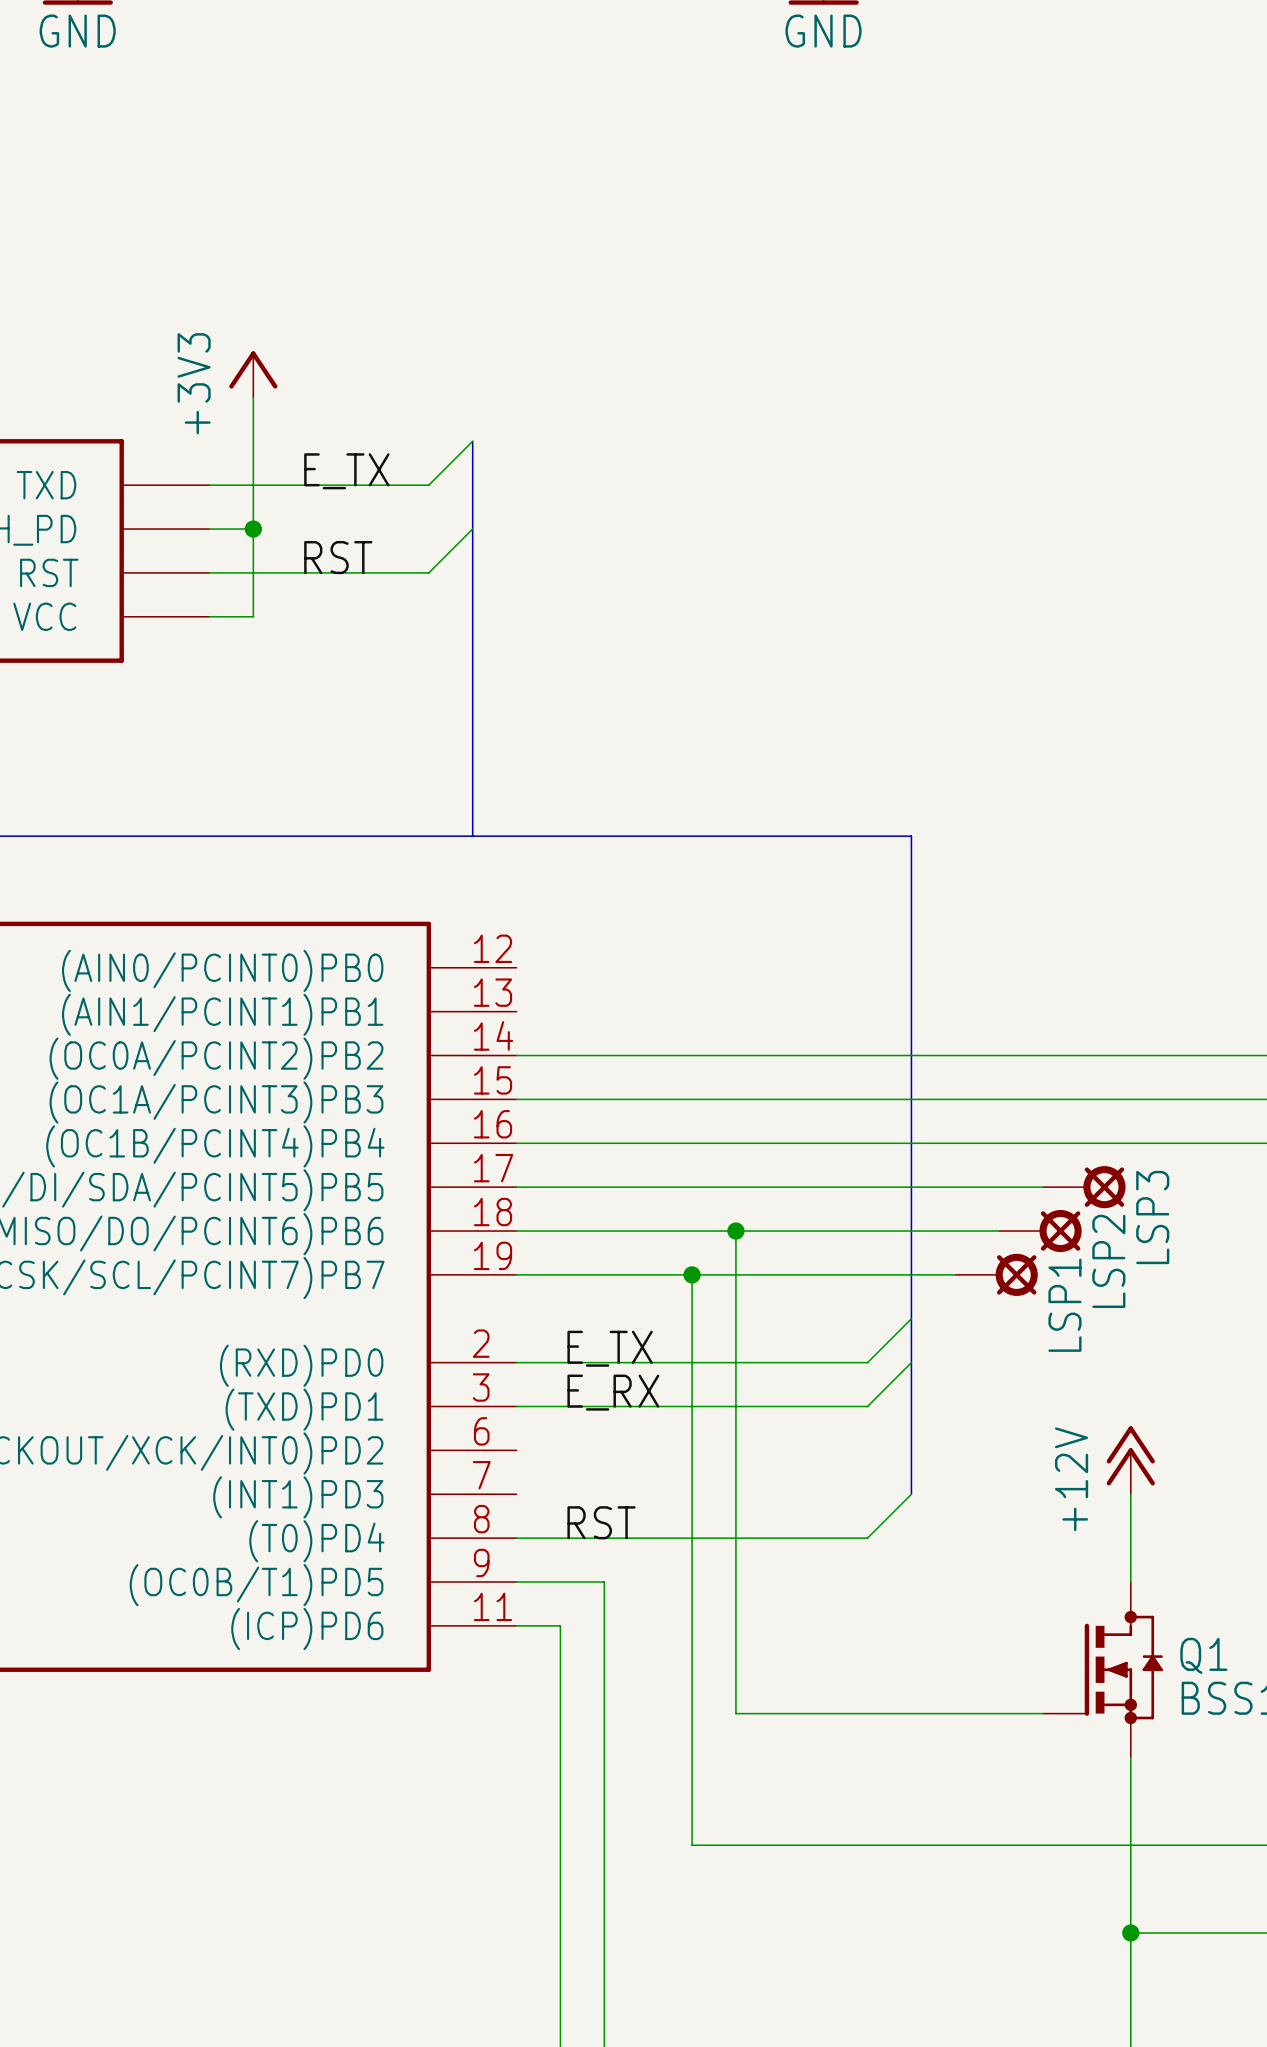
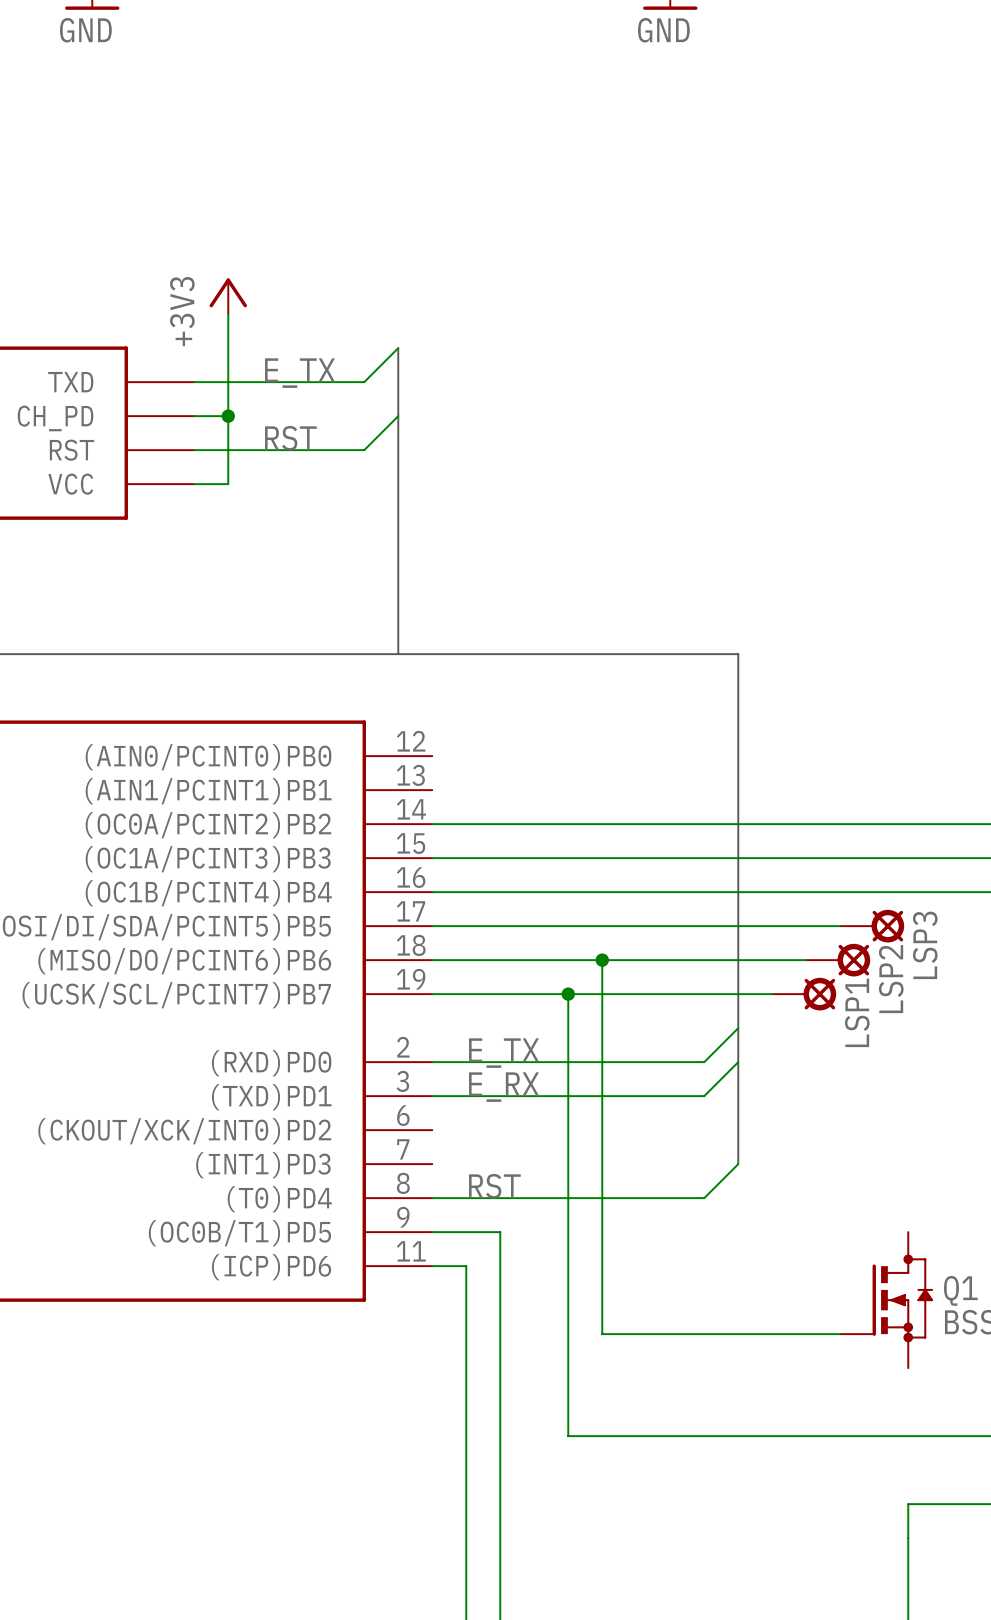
power symbol: +12V (1130, 1460) -> none
wire: (1130, 1494) (1130, 1581) -> none
wire: (1130, 1757) (1130, 1932) -> none
junction: (1130, 1932) -> none

